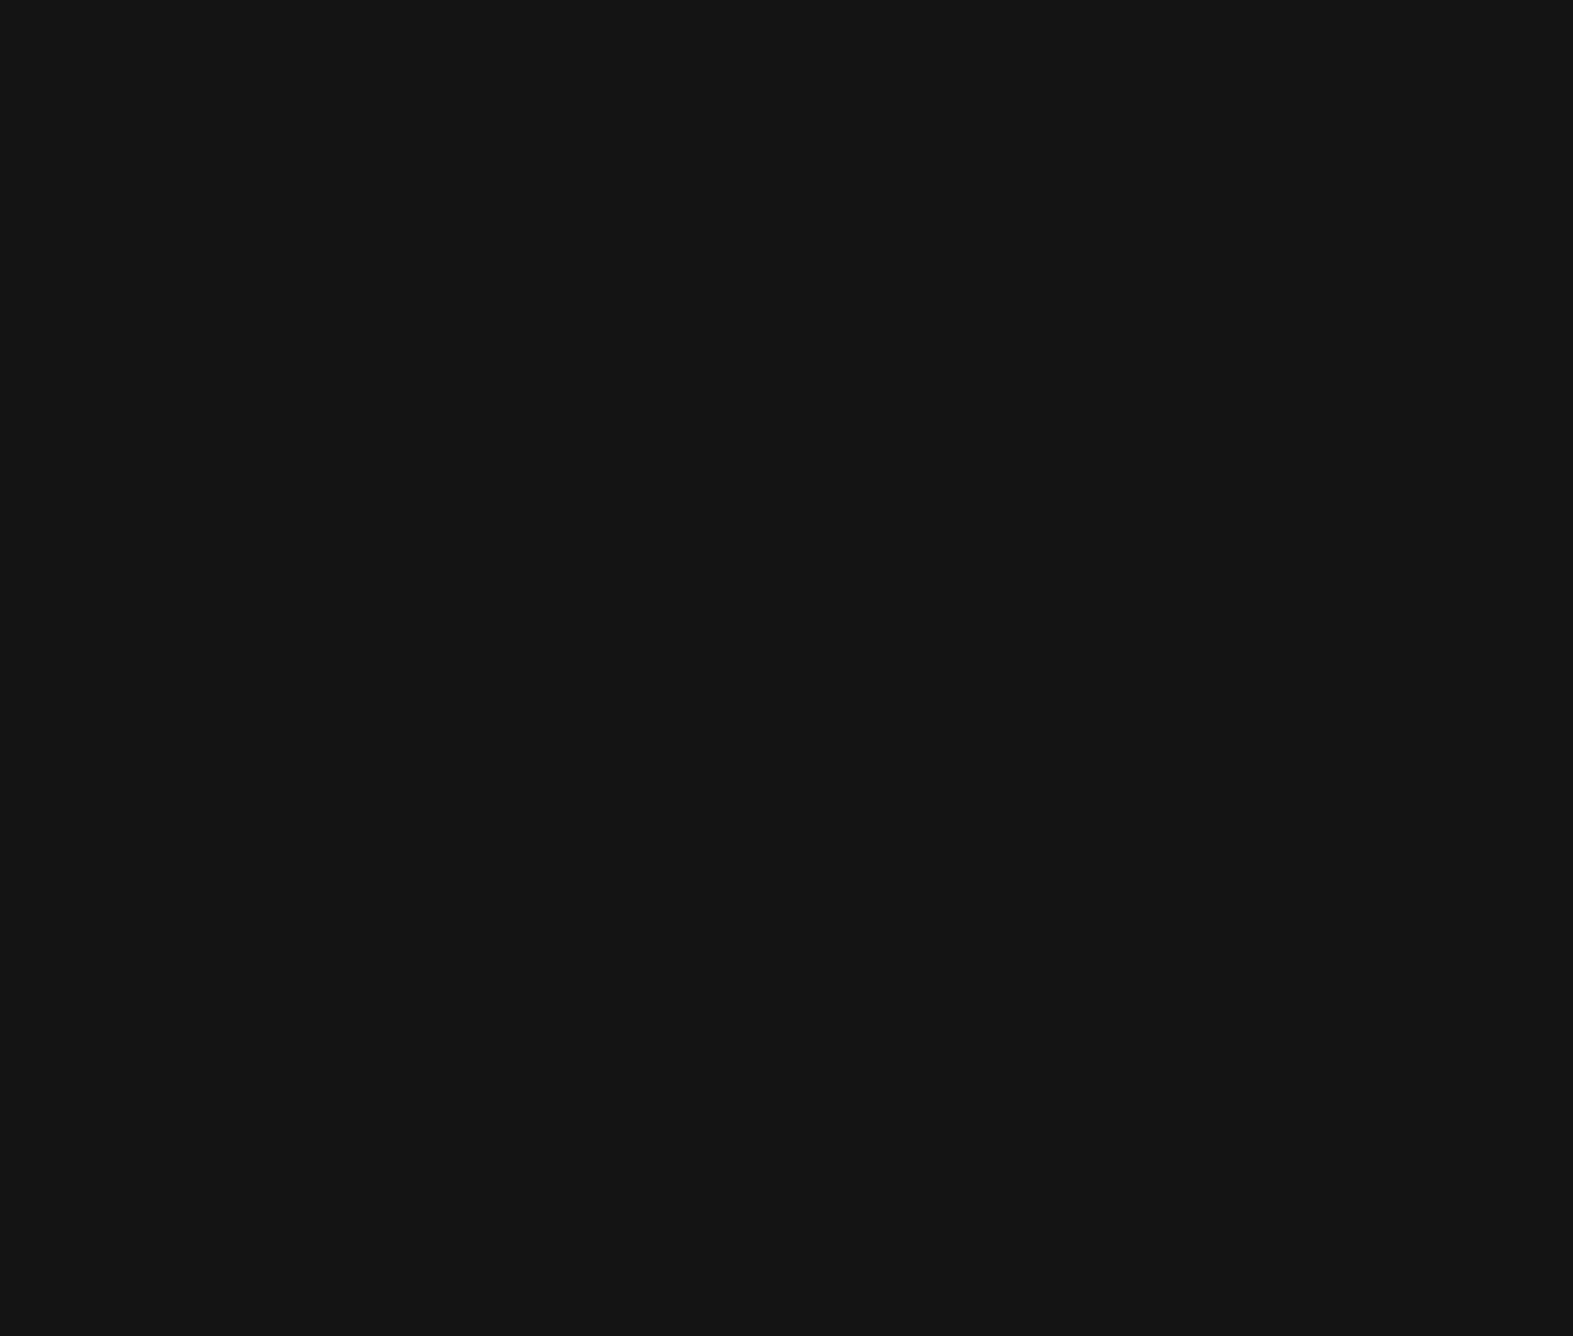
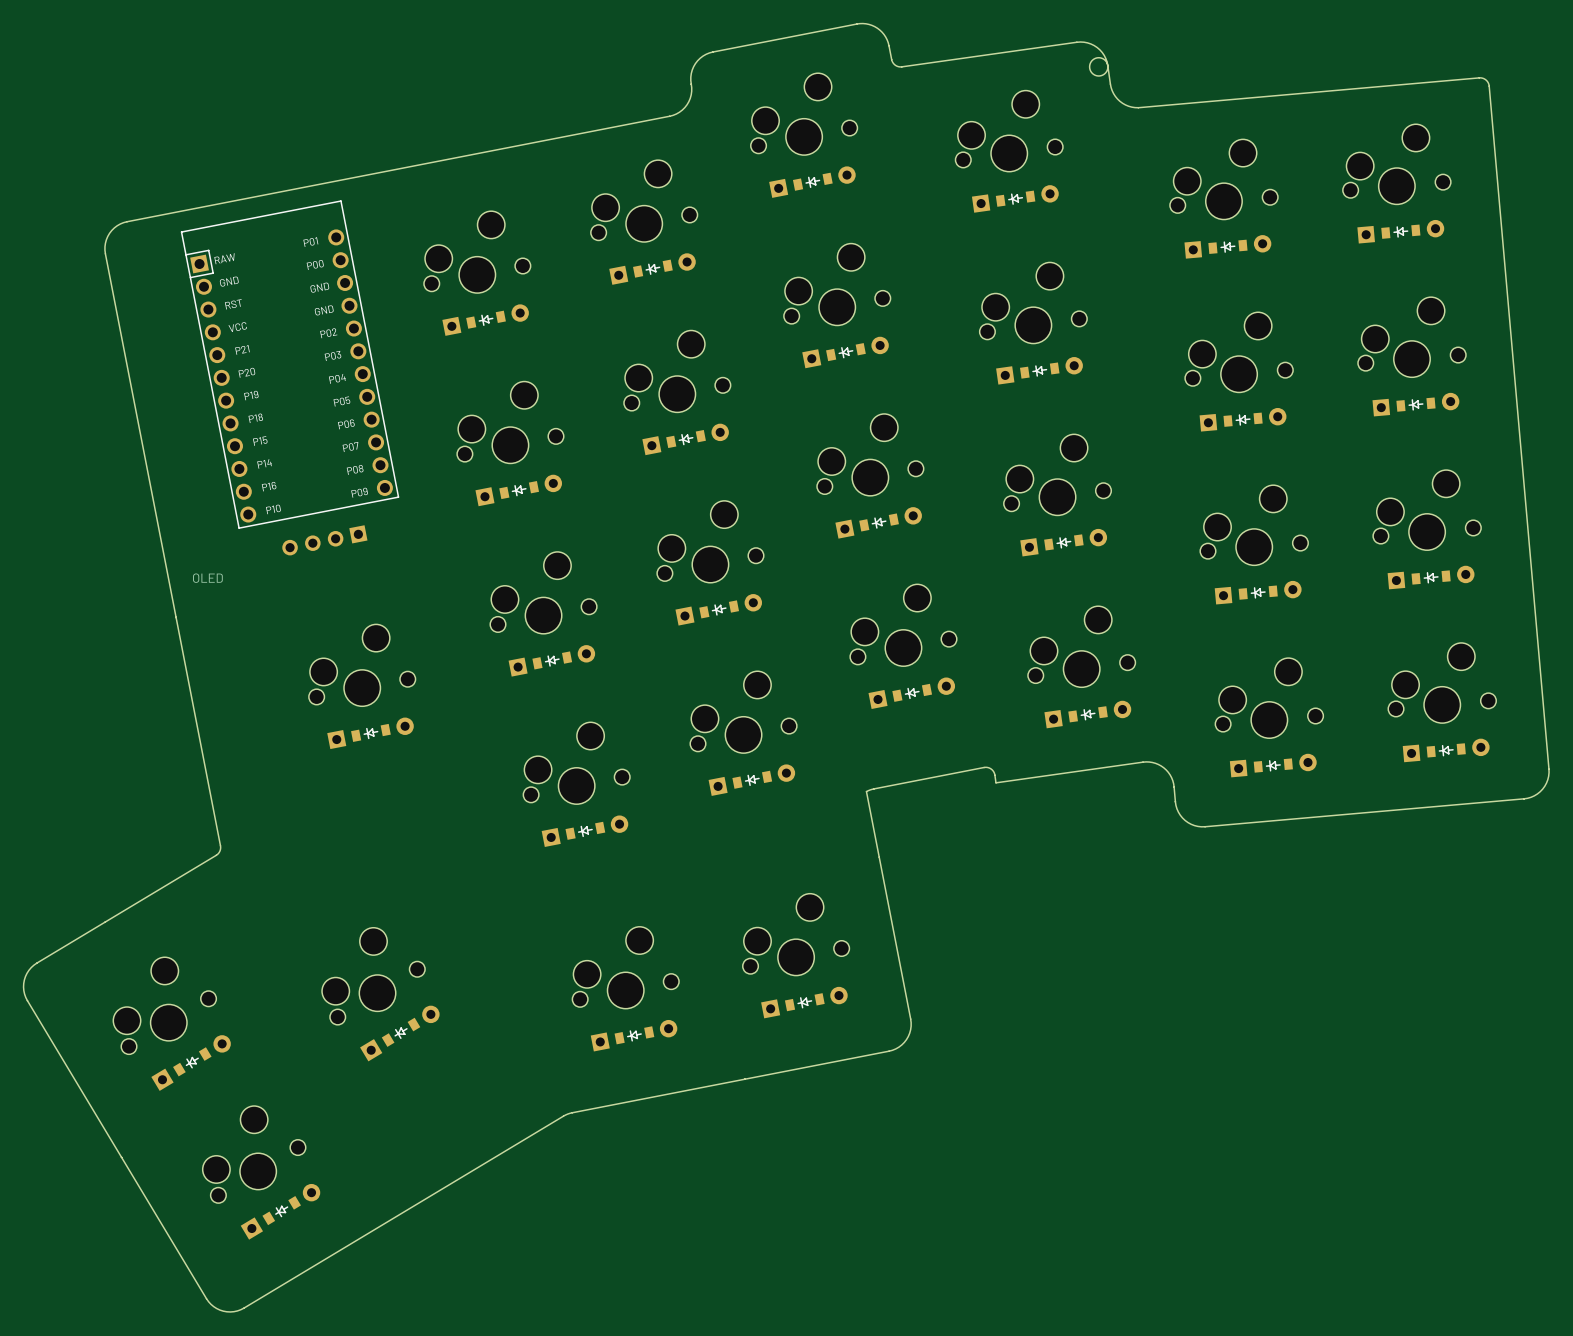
board edge: none -> (1107, 65) (1111, 87) (1115, 96) (1122, 103) (1135, 107) (1479, 77) (1487, 82) (1548, 769) (1547, 779) (1542, 789) (1534, 795) (1524, 798)
board edge: none -> (1107, 65) (1104, 55) (1097, 47) (1080, 42) (899, 66) (892, 61) (888, 42) (882, 32) (871, 25) (856, 24) (706, 54) (697, 60) (692, 70) (691, 91) (688, 101) (682, 110) (673, 115) (127, 221) (114, 227) (106, 239) (105, 253) (220, 848) (216, 855) (33, 965) (24, 980) (23, 990) (27, 1000)
board edge: none -> (1107, 65) (1104, 59) (1097, 57) (1091, 61) (1089, 68) (1093, 74) (1100, 75) (1106, 72) (1107, 65)
part: none -> (804, 114)
part: none -> (1009, 131)
part: none -> (1396, 164)
part: none -> (1223, 179)
part: none -> (812, 182)
part: none -> (1015, 198)
part: none -> (644, 201)
part: none -> (1400, 231)
part: none -> (1227, 246)
part: none -> (477, 252)
part: none -> (652, 269)
part: none -> (837, 284)
part: none -> (1033, 303)
part: none -> (485, 320)
part: none -> (1411, 337)
part: none -> (845, 352)
part: none -> (1239, 352)
part: none -> (290, 364)
part: none -> (1039, 370)
part: none -> (677, 371)
part: none -> (1415, 404)
part: none -> (1243, 419)
part: none -> (510, 422)
part: none -> (685, 439)
part: none -> (870, 454)
part: none -> (1057, 474)
part: none -> (518, 490)
part: none -> (1427, 510)
part: none -> (878, 522)
part: none -> (1254, 525)
part: none -> OLED (324, 540)
part: none -> (710, 541)
part: none -> (1063, 542)
part: none -> (1431, 577)
part: none -> (543, 592)
part: none -> (1258, 592)
part: none -> (718, 609)
part: none -> (903, 625)
part: none -> (1081, 646)
part: none -> (551, 660)
part: none -> (362, 665)
part: none -> (1442, 683)
part: none -> (911, 693)
part: none -> (1269, 698)
part: none -> (743, 712)
part: none -> (1087, 714)
part: none -> (370, 733)
part: none -> (1446, 750)
part: none -> (576, 763)
part: none -> (1273, 765)
part: none -> (751, 780)
board edge: none -> (1174, 786) (1175, 801)
board edge: none -> (1174, 786) (1170, 774) (1163, 767) (1155, 763) (1146, 761) (995, 782) (993, 771) (985, 767) (866, 791) (910, 1019) (909, 1033) (901, 1044) (889, 1051) (567, 1114) (244, 1308) (234, 1311) (216, 1308) (206, 1298) (27, 1000)
board edge: none -> (1524, 798) (1201, 826) (1185, 820) (1178, 812) (1175, 801)
part: none -> (584, 831)
part: none -> (796, 934)
part: none -> (625, 967)
part: none -> (373, 976)
part: none -> (804, 1002)
part: none -> (164, 1005)
part: none -> (399, 1033)
part: none -> (634, 1035)
part: none -> (191, 1063)
part: none -> (254, 1154)
part: none -> (280, 1211)

